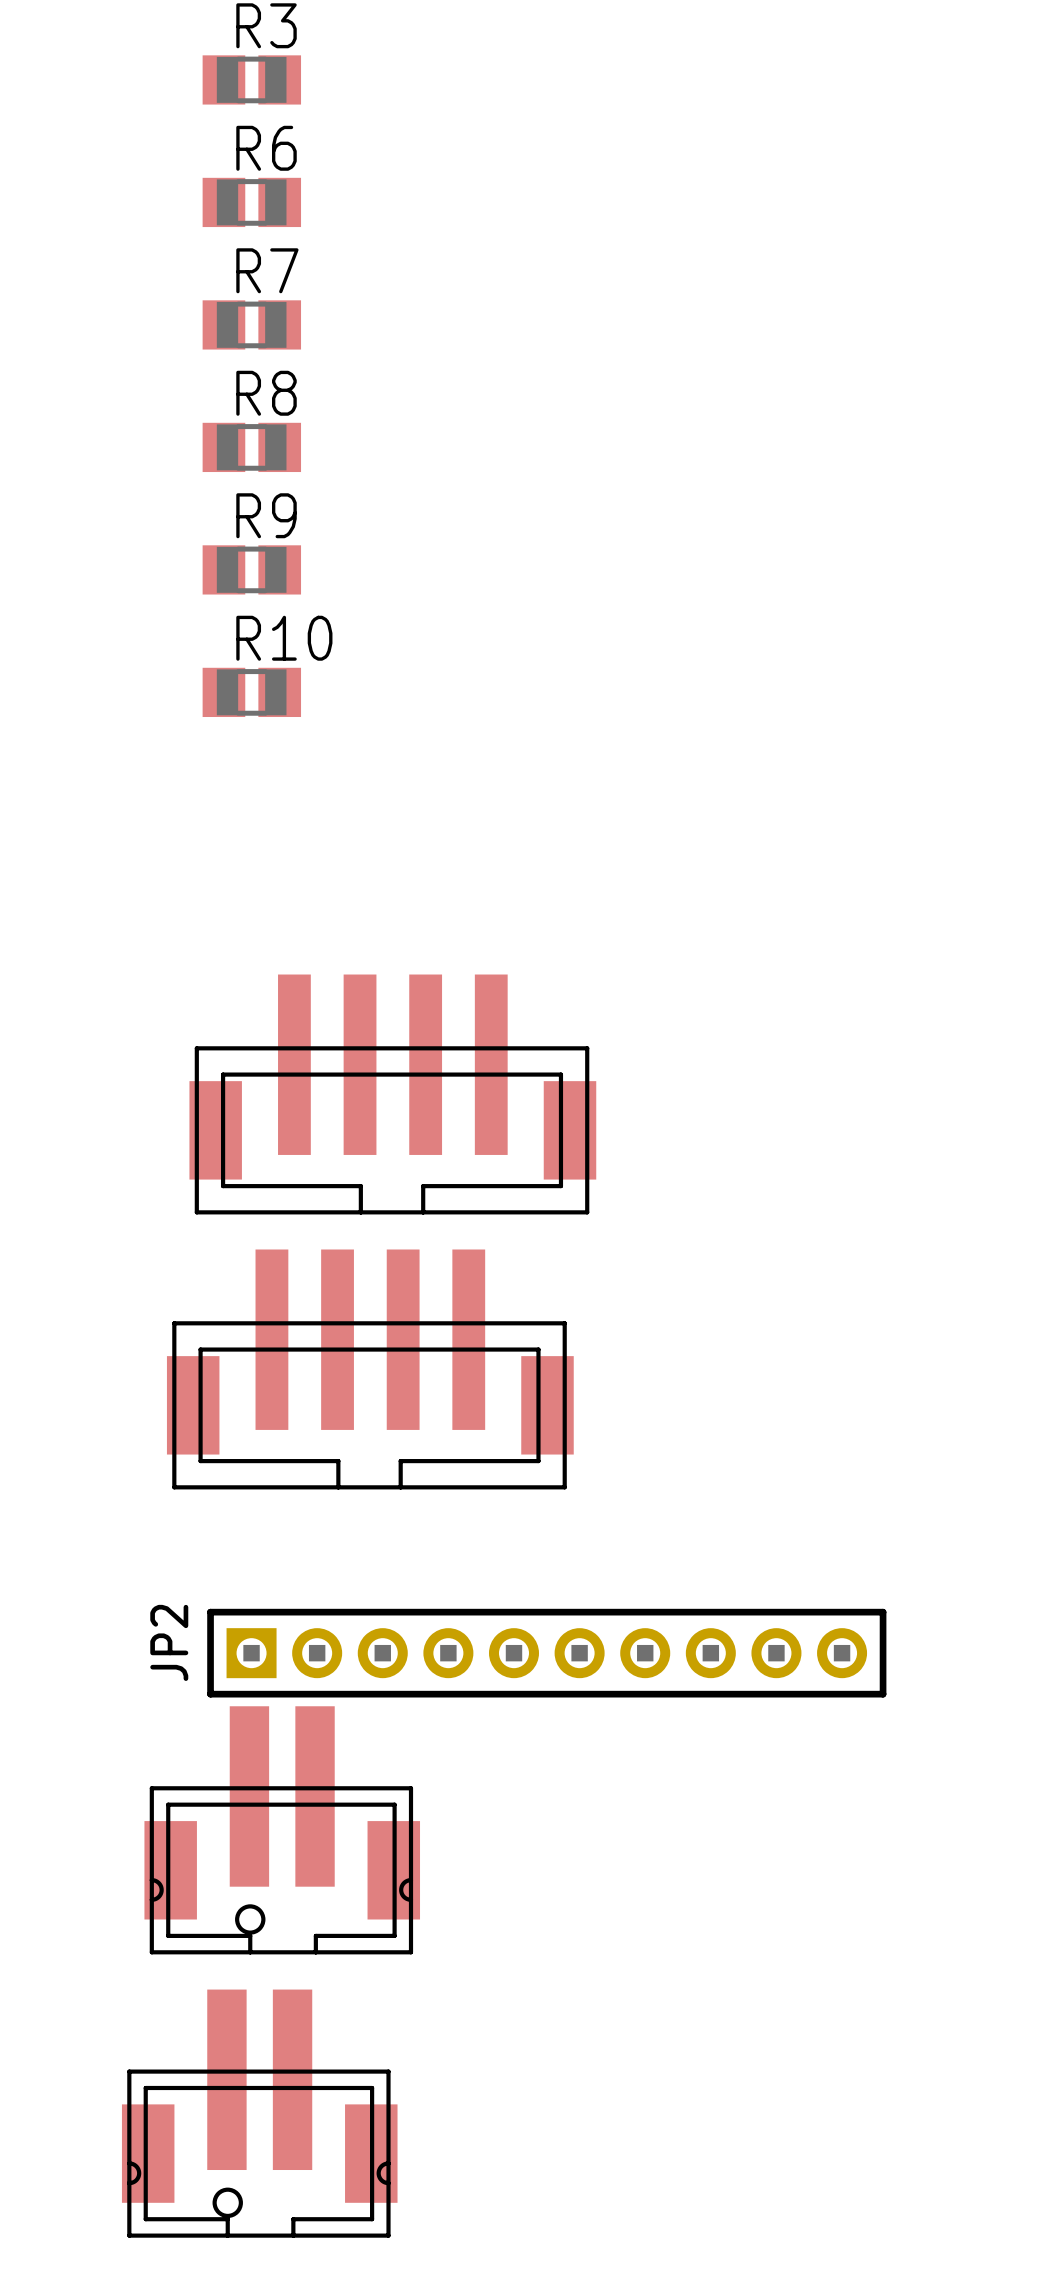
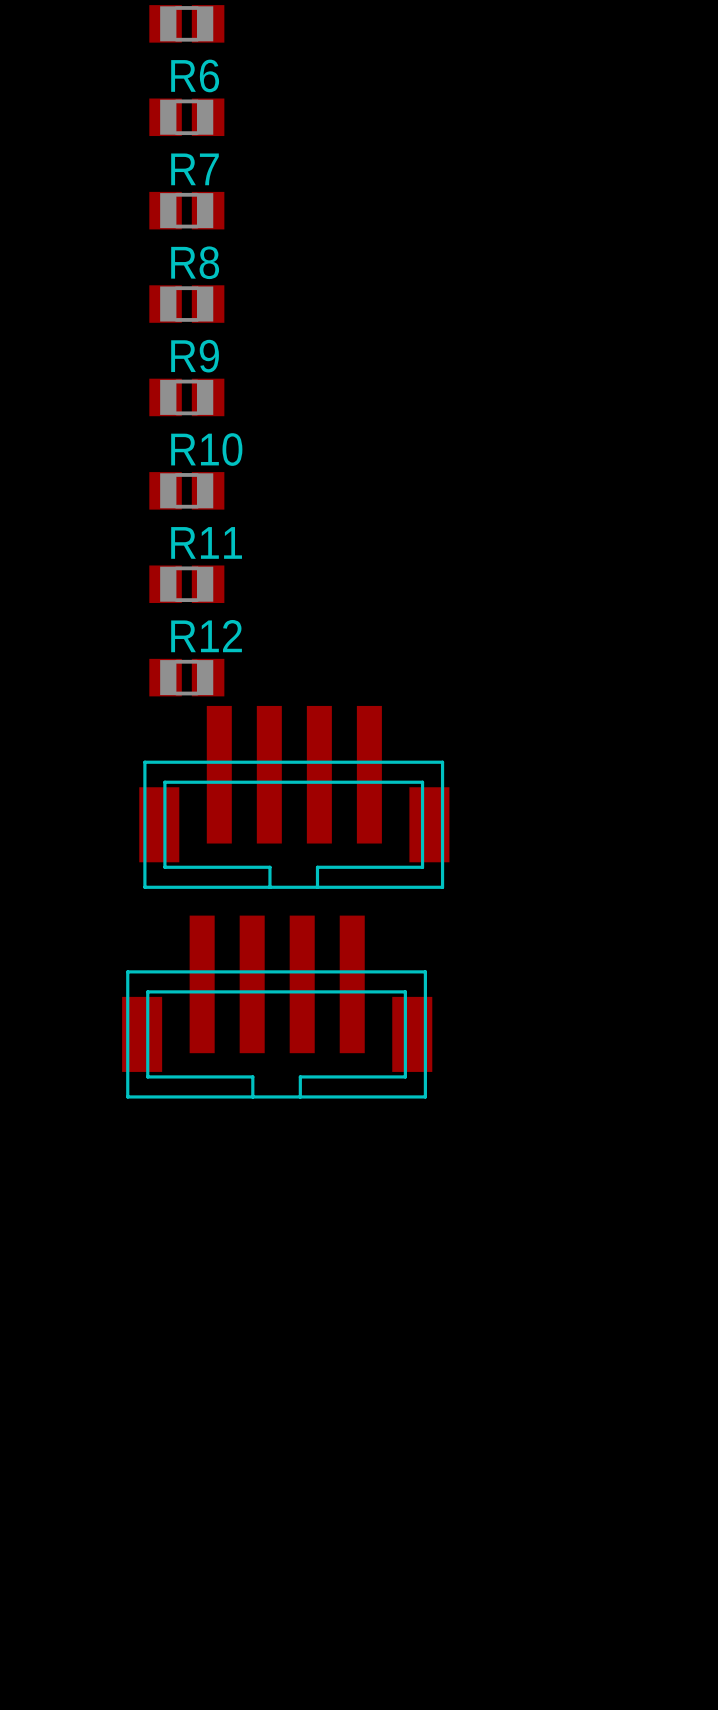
R11: none -> (186, 584)
R12: none -> (186, 677)
JP2: (546, 1653) -> none
part: (282, 1830) -> none
part: (259, 2113) -> none

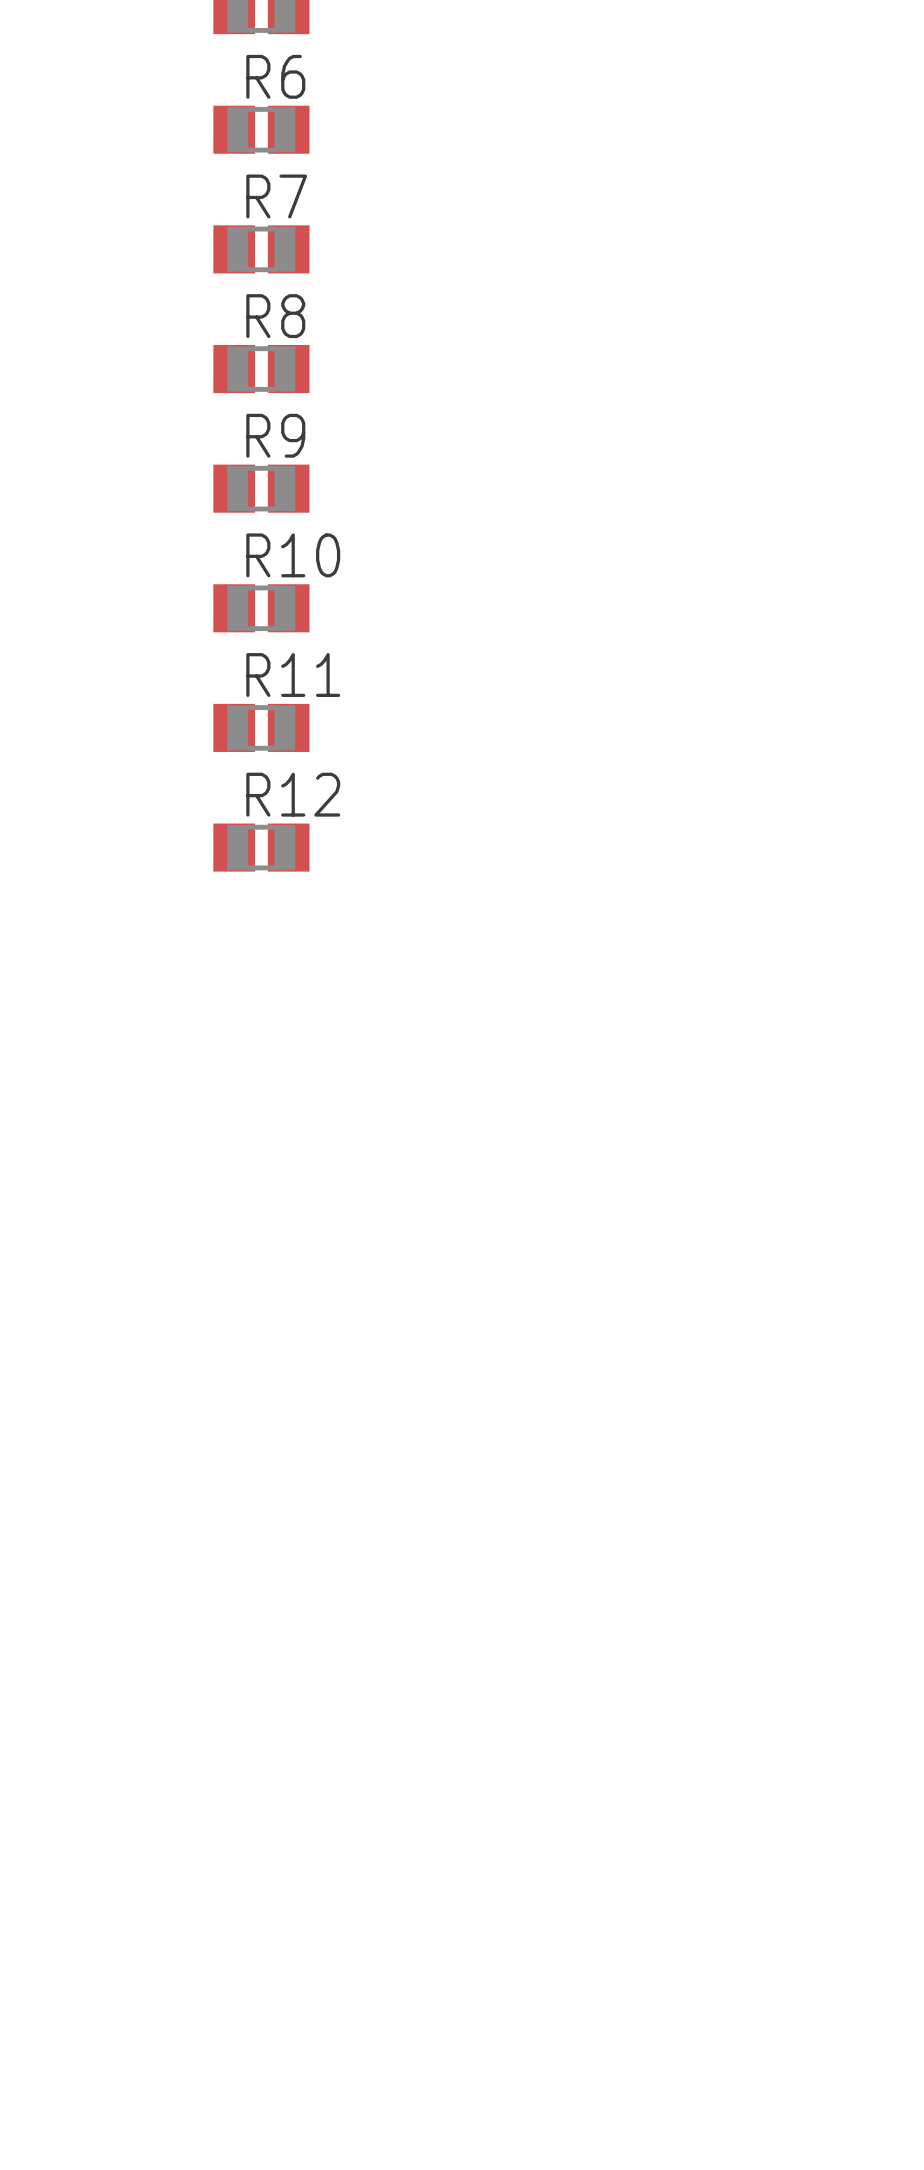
part: (294, 797) -> none
part: (277, 1007) -> none

